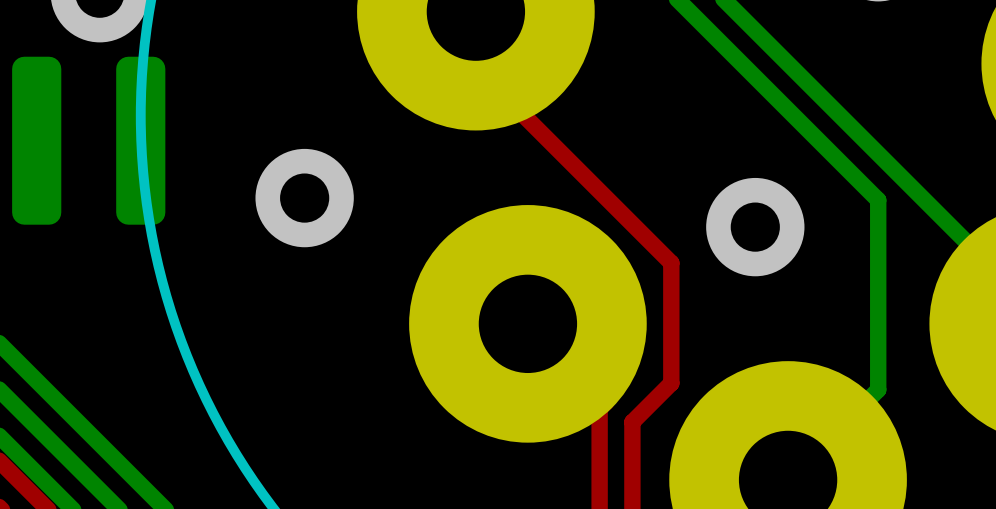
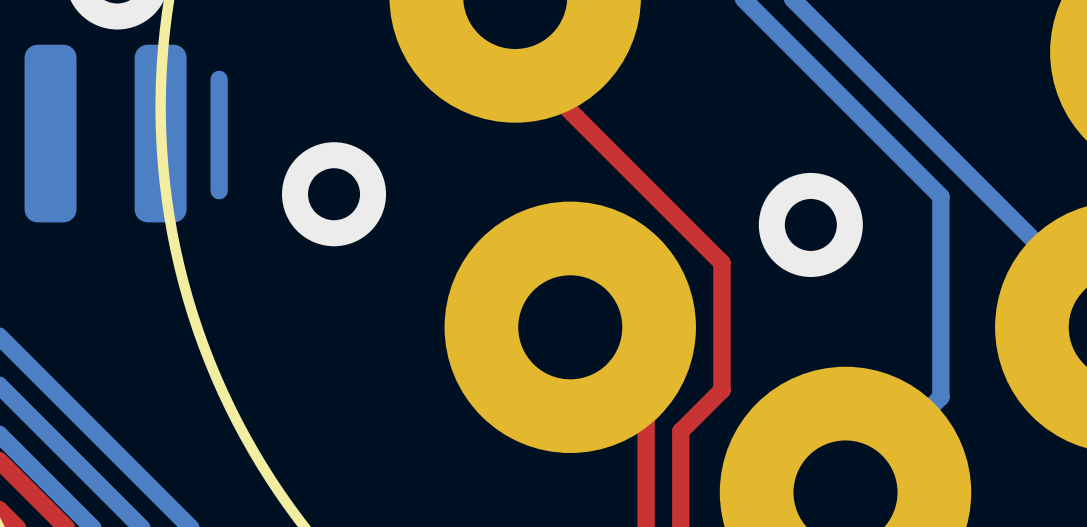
bottom track: none -> (219, 79) (219, 190)

